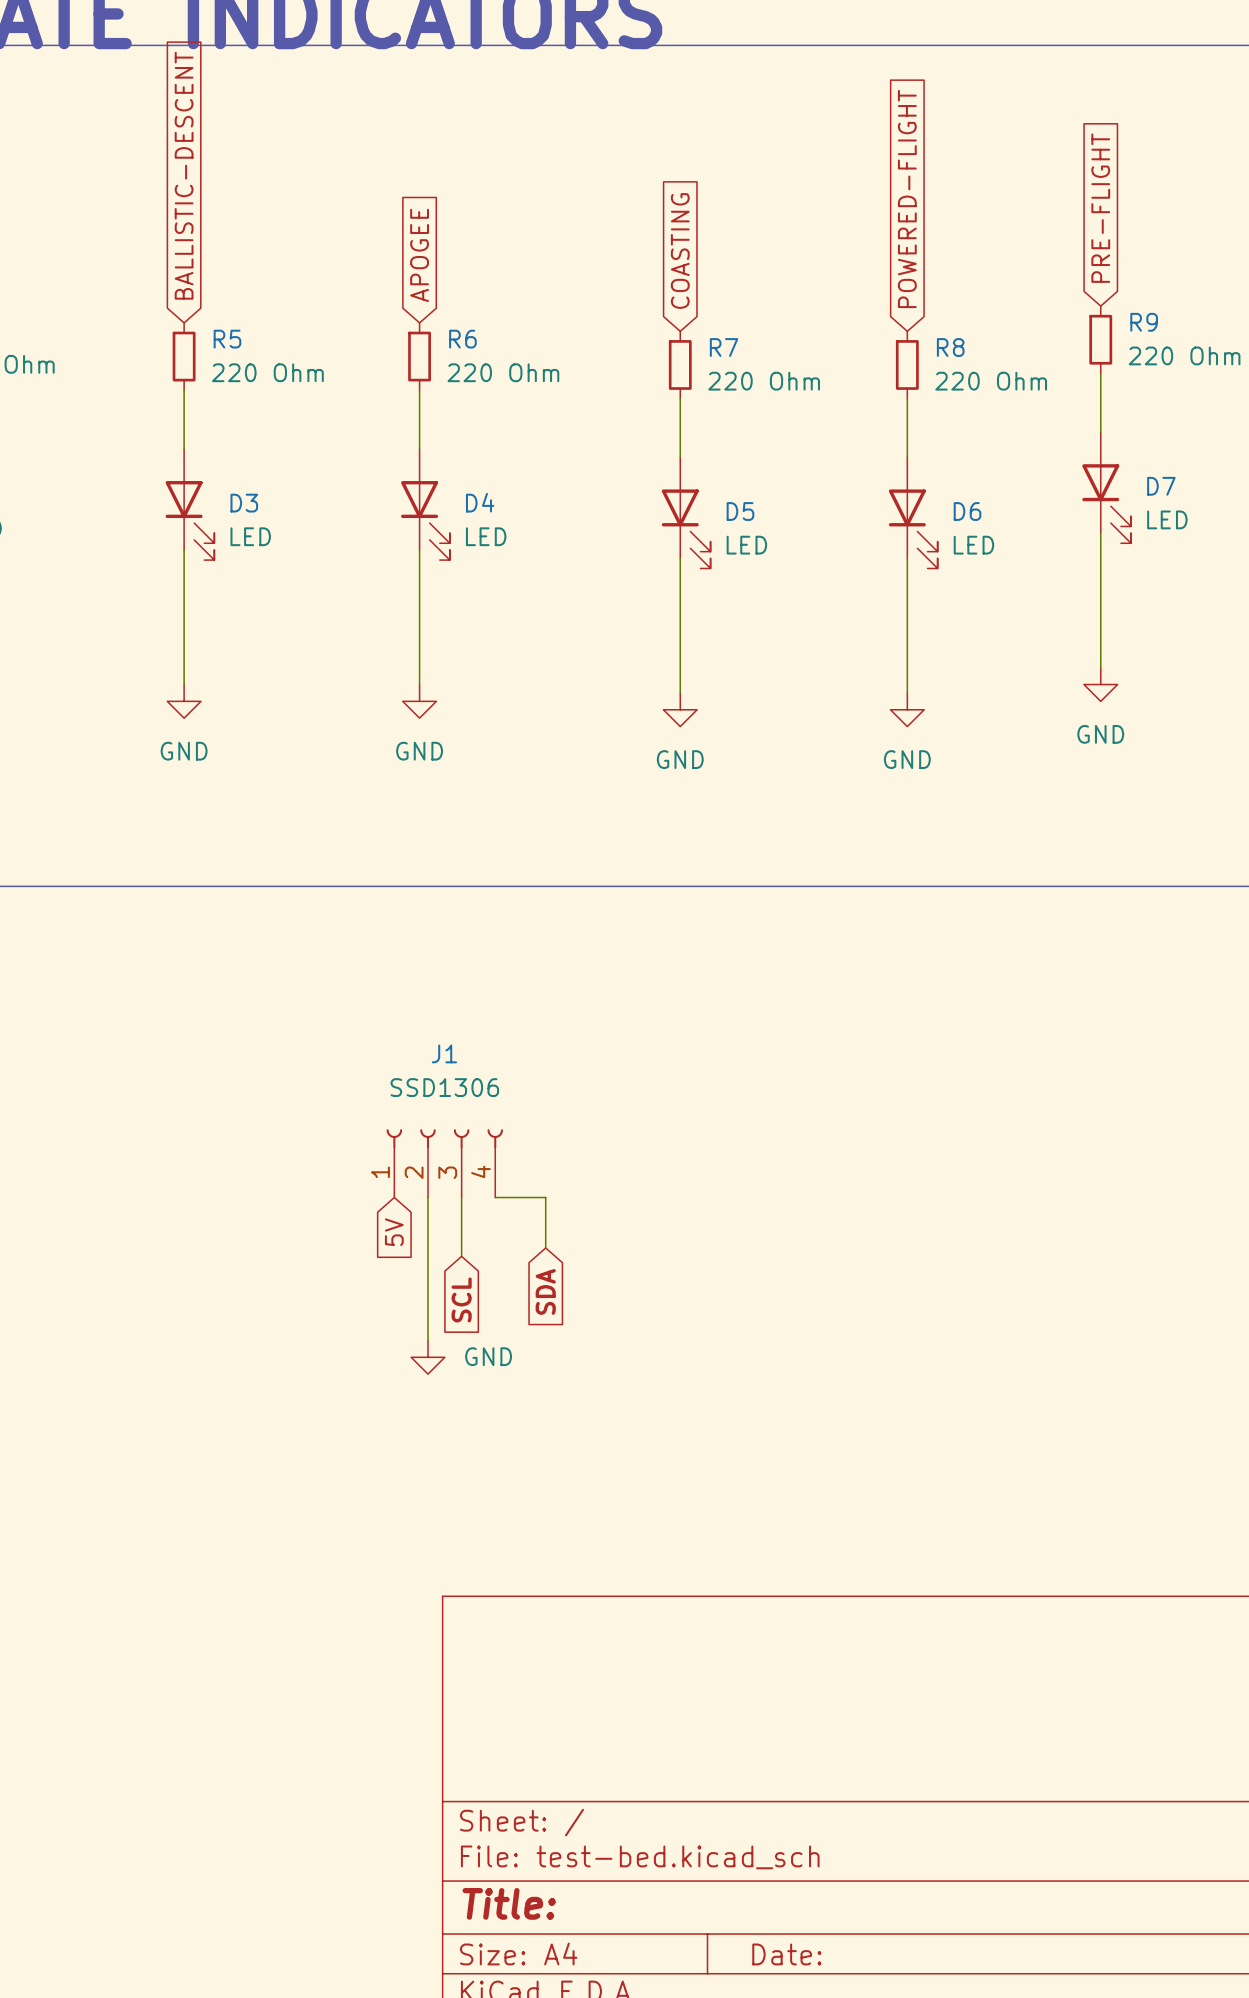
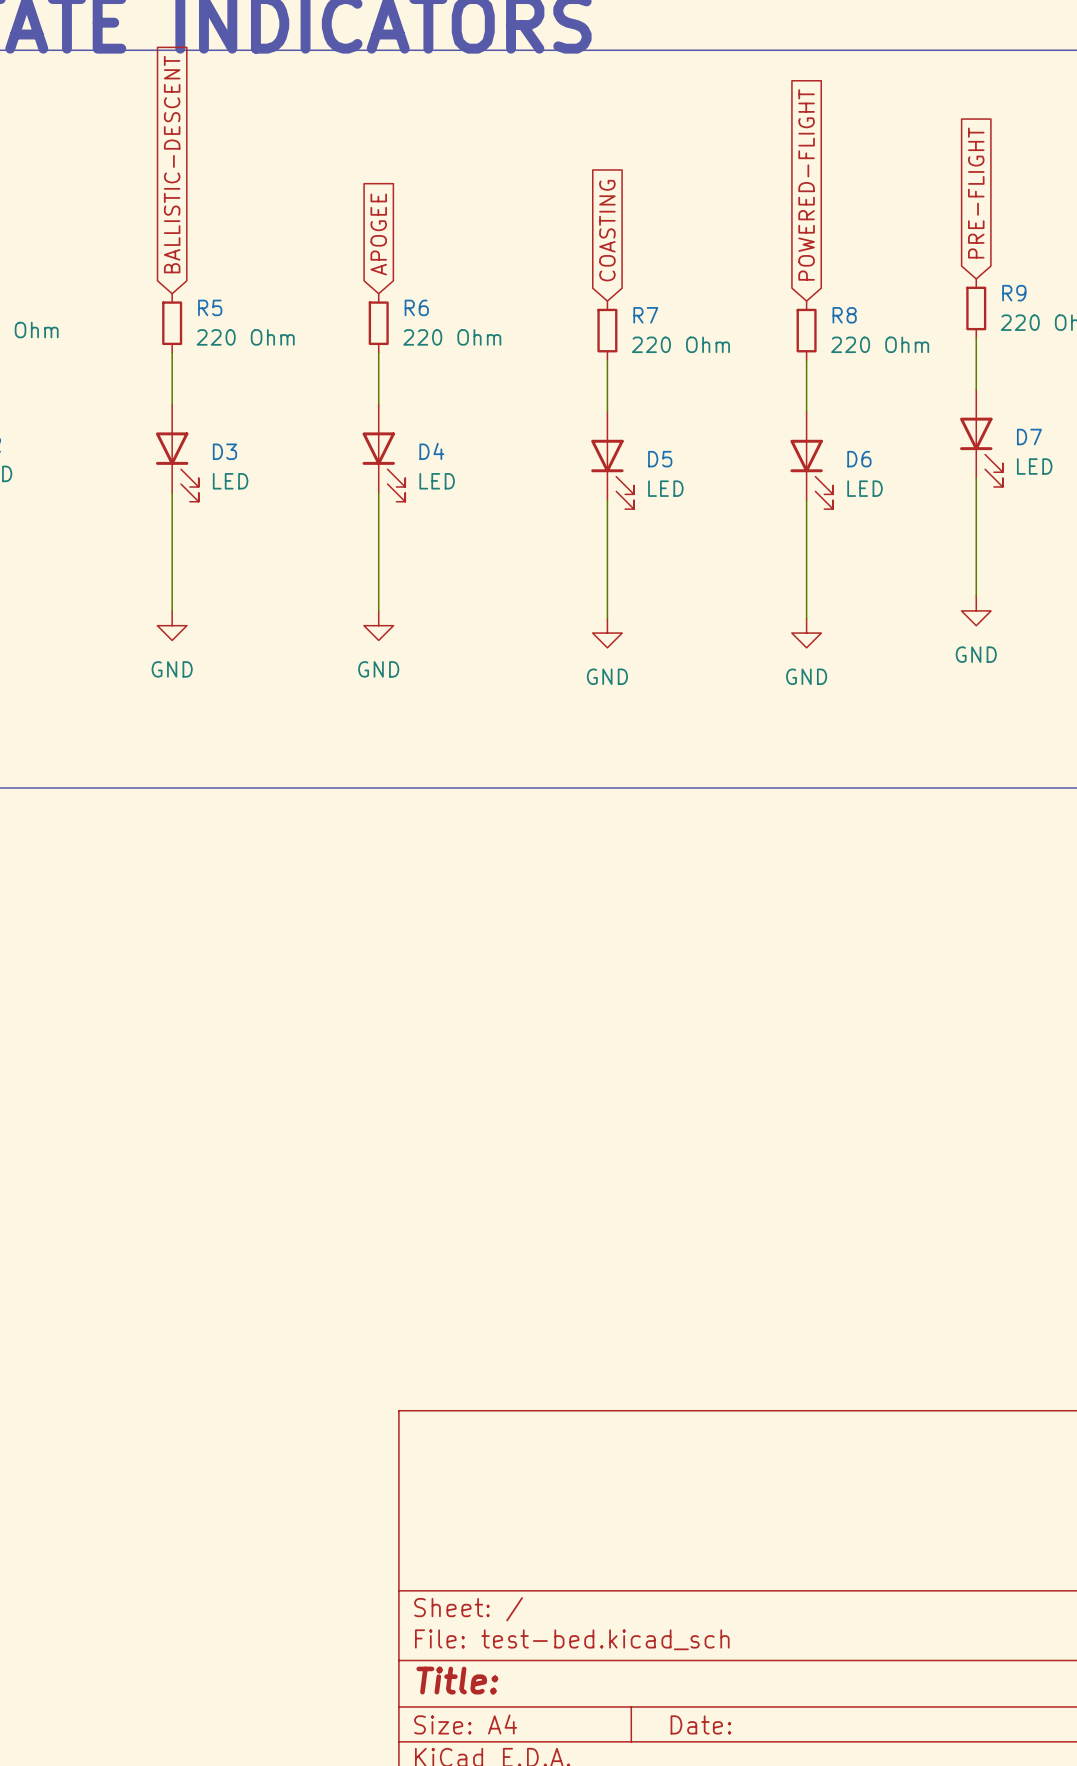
J1: SSD1306 (444, 1163) -> none
wire: (427, 1197) (427, 1340) -> none
wire: (461, 1197) (461, 1256) -> none
wire: (495, 1197) (545, 1197) (545, 1247) -> none
global label: 5V (394, 1232) -> none
global label: SDA (545, 1291) -> none
global label: SCL (461, 1299) -> none
power symbol: GND (427, 1357) -> none

